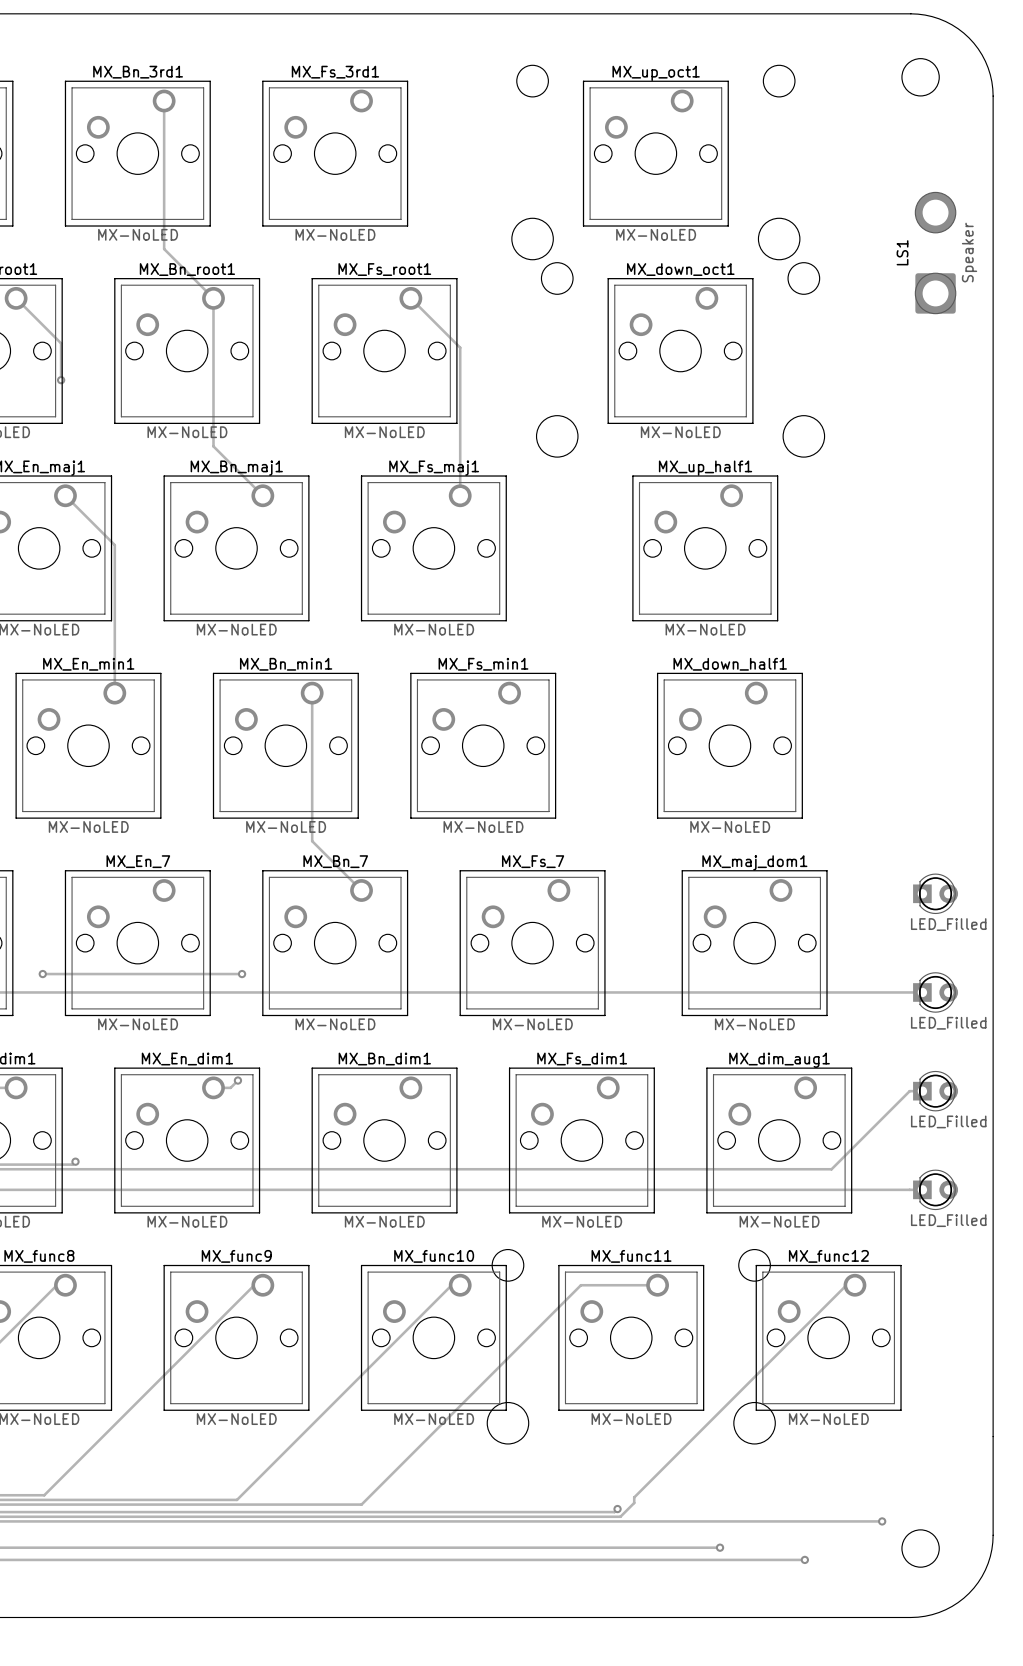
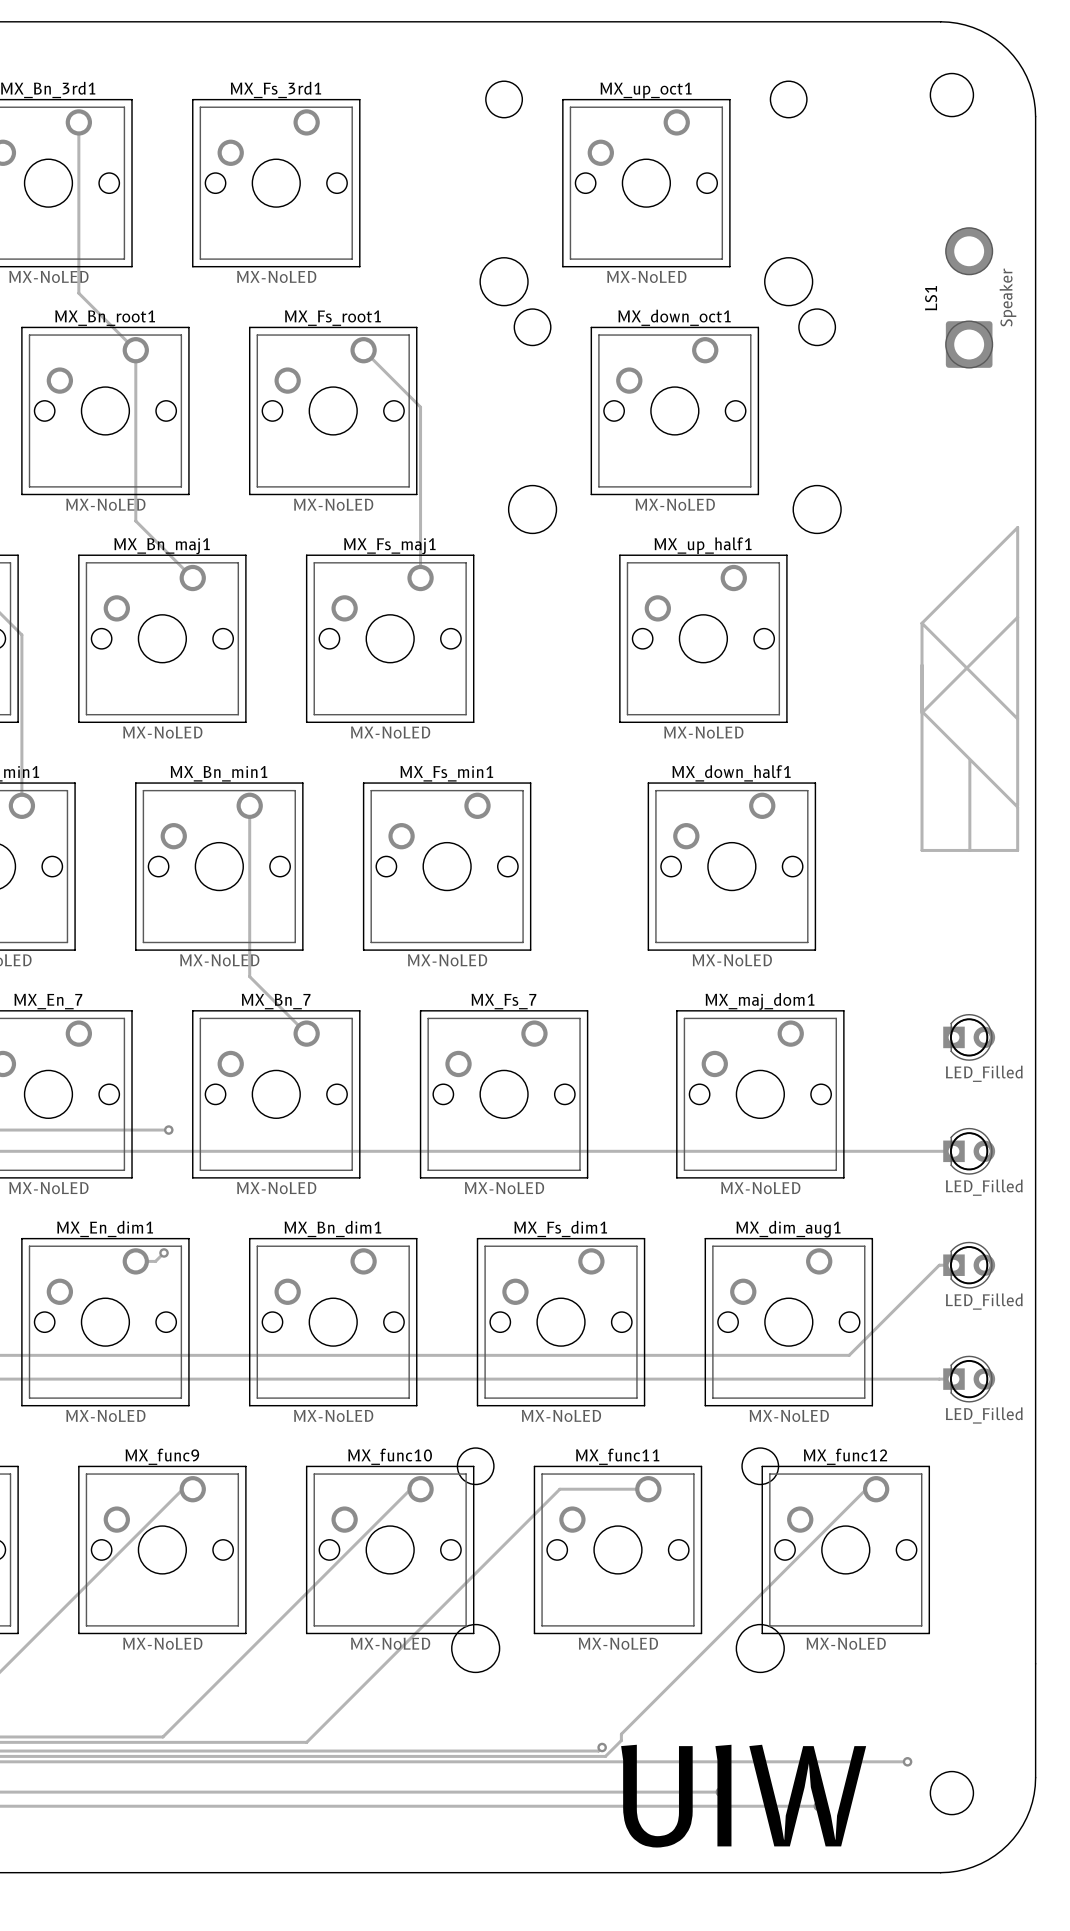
track: none -> (1017, 617) (922, 712)
track: none -> (922, 623) (922, 850) (1017, 850) (1017, 807) (922, 711)
track: none -> (922, 623) (1017, 718)
track: none -> (922, 623) (1017, 527) (1017, 805)
track: none -> (969, 760) (969, 850)
text: none -> UIW (743, 1796)

